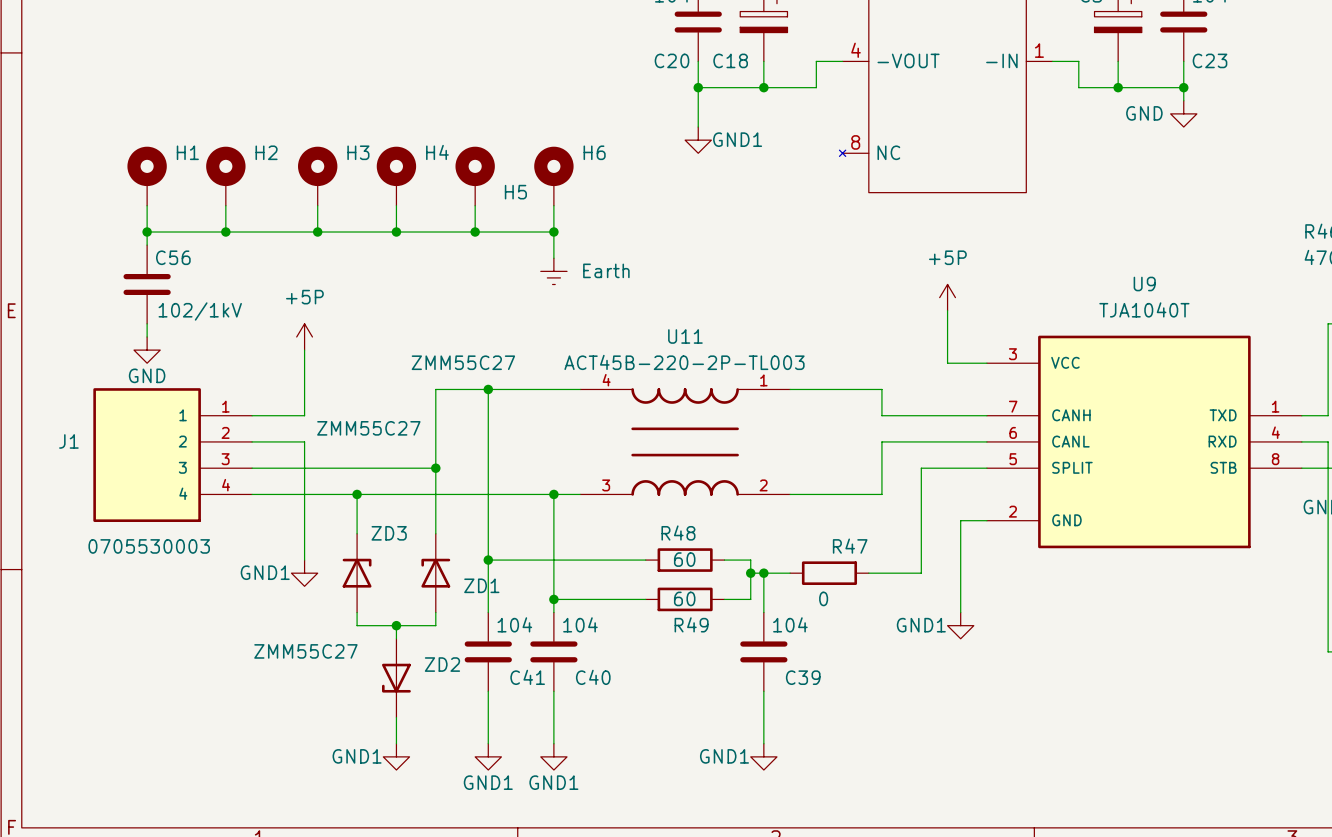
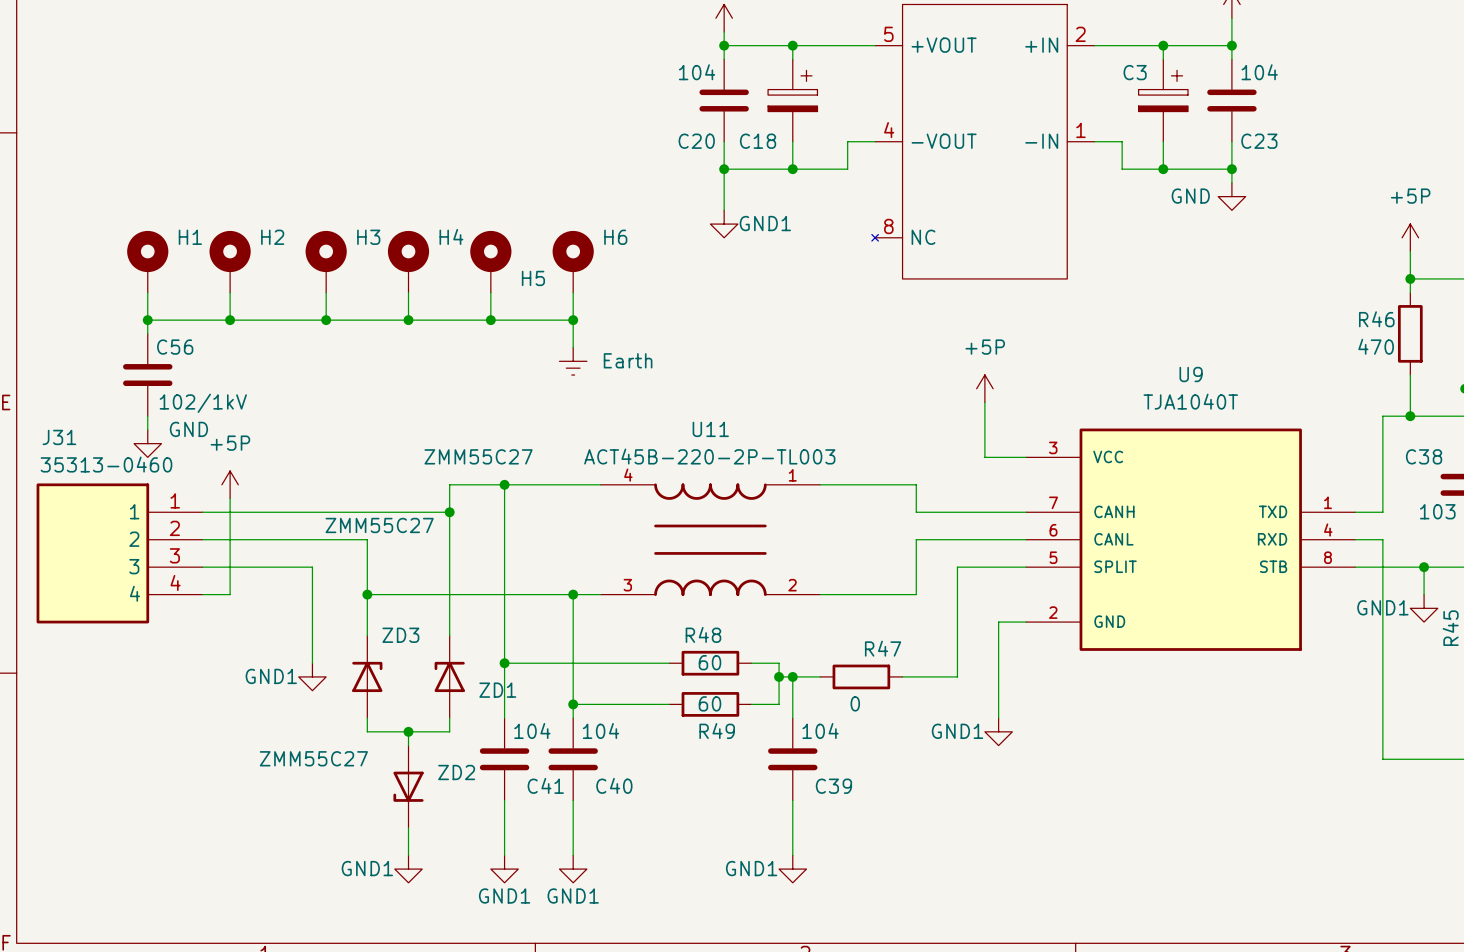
power symbol position: +5P (304, 336) -> +5P (230, 484)
wire: (304, 350) (304, 415) -> (449, 512) (312, 512)
power symbol text position: GND (147, 375) -> GND (188, 429)
wire: none -> (230, 498) (230, 594) (202, 594)
wire: (304, 441) (304, 468) (435, 468) -> none
J31: none -> 35313-0460 (119, 553)
J1: 0705530003 (172, 455) -> none
junction position: (435, 468) -> (449, 512)
wire: (252, 494) (357, 494) -> (312, 539) (367, 539) (367, 594)

